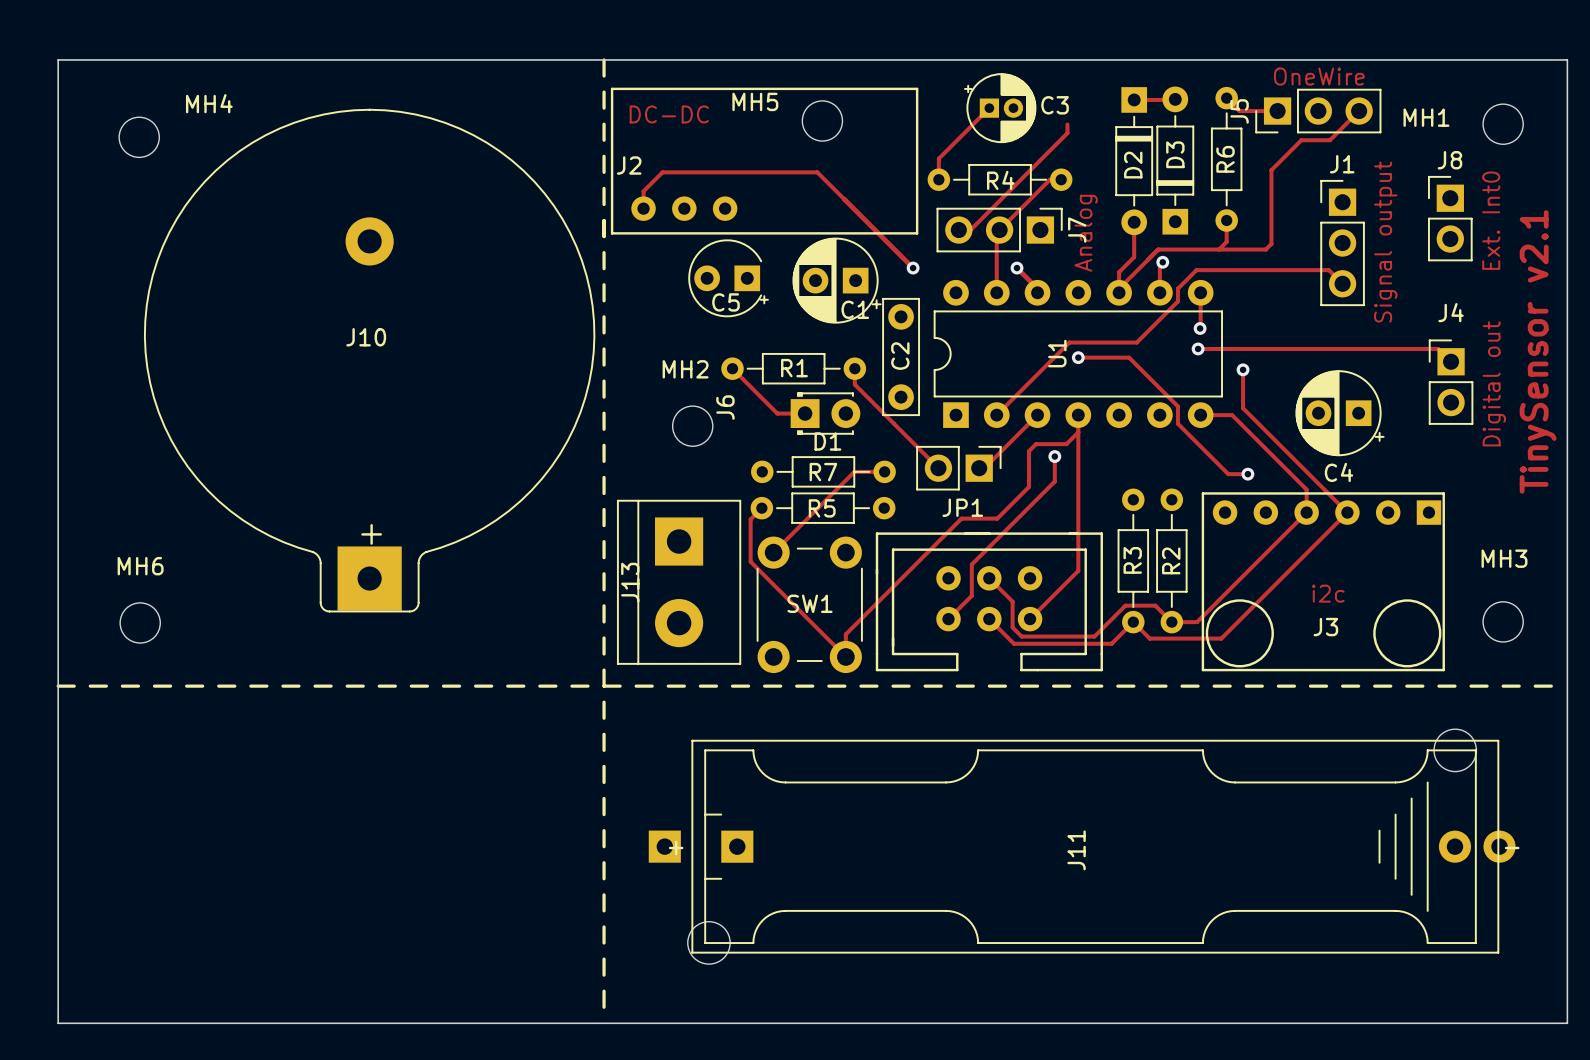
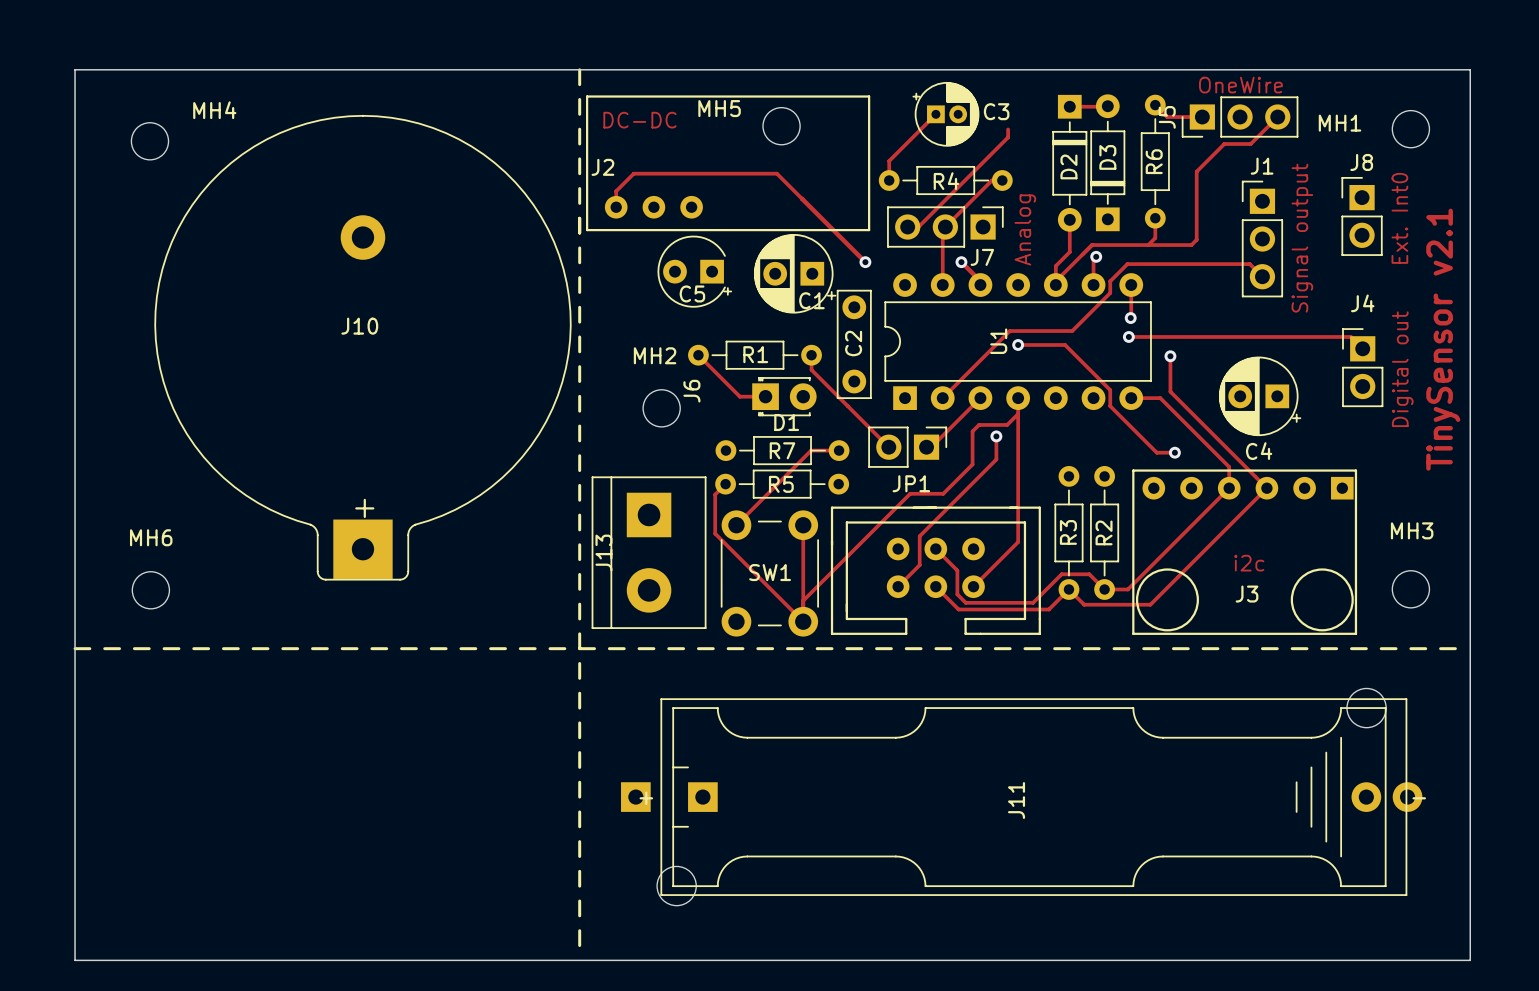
J7 name rotation: 0° (1077, 230) -> 90° clockwise (982, 257)
J7 name position: J7 (1077, 230) -> J7 (982, 257)
track: none -> (803, 525) (803, 600)

